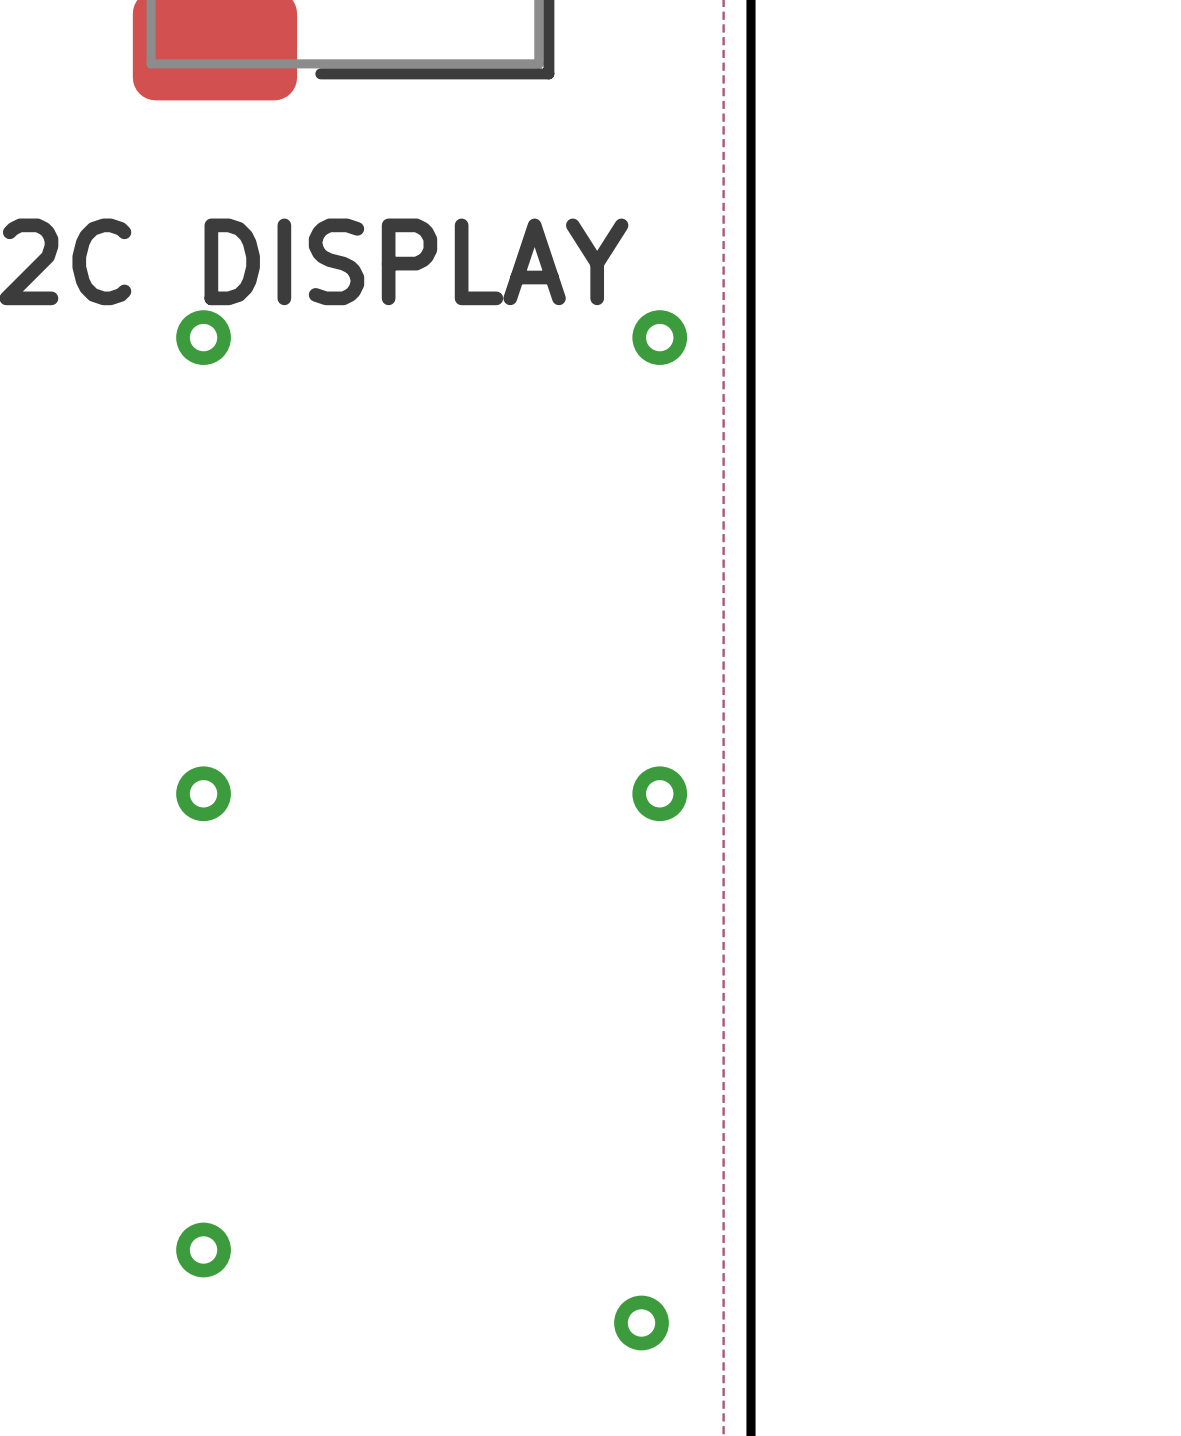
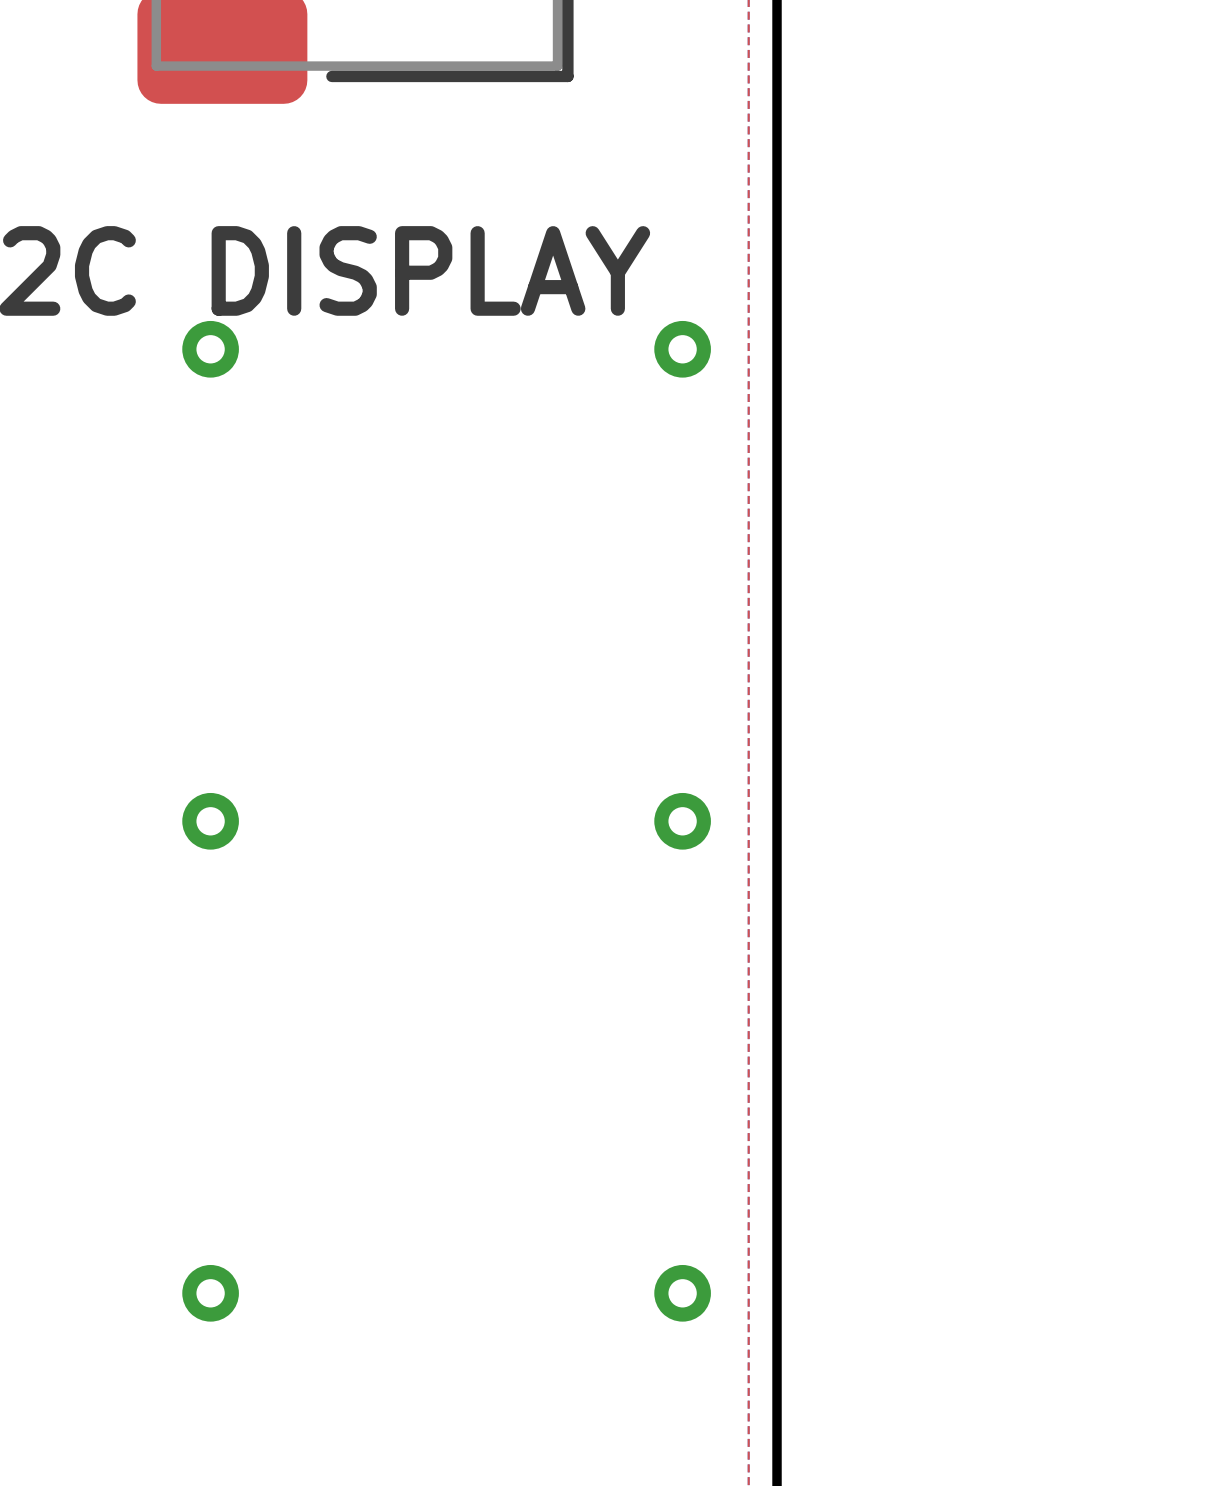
via position: (641, 1322) -> (682, 1293)

